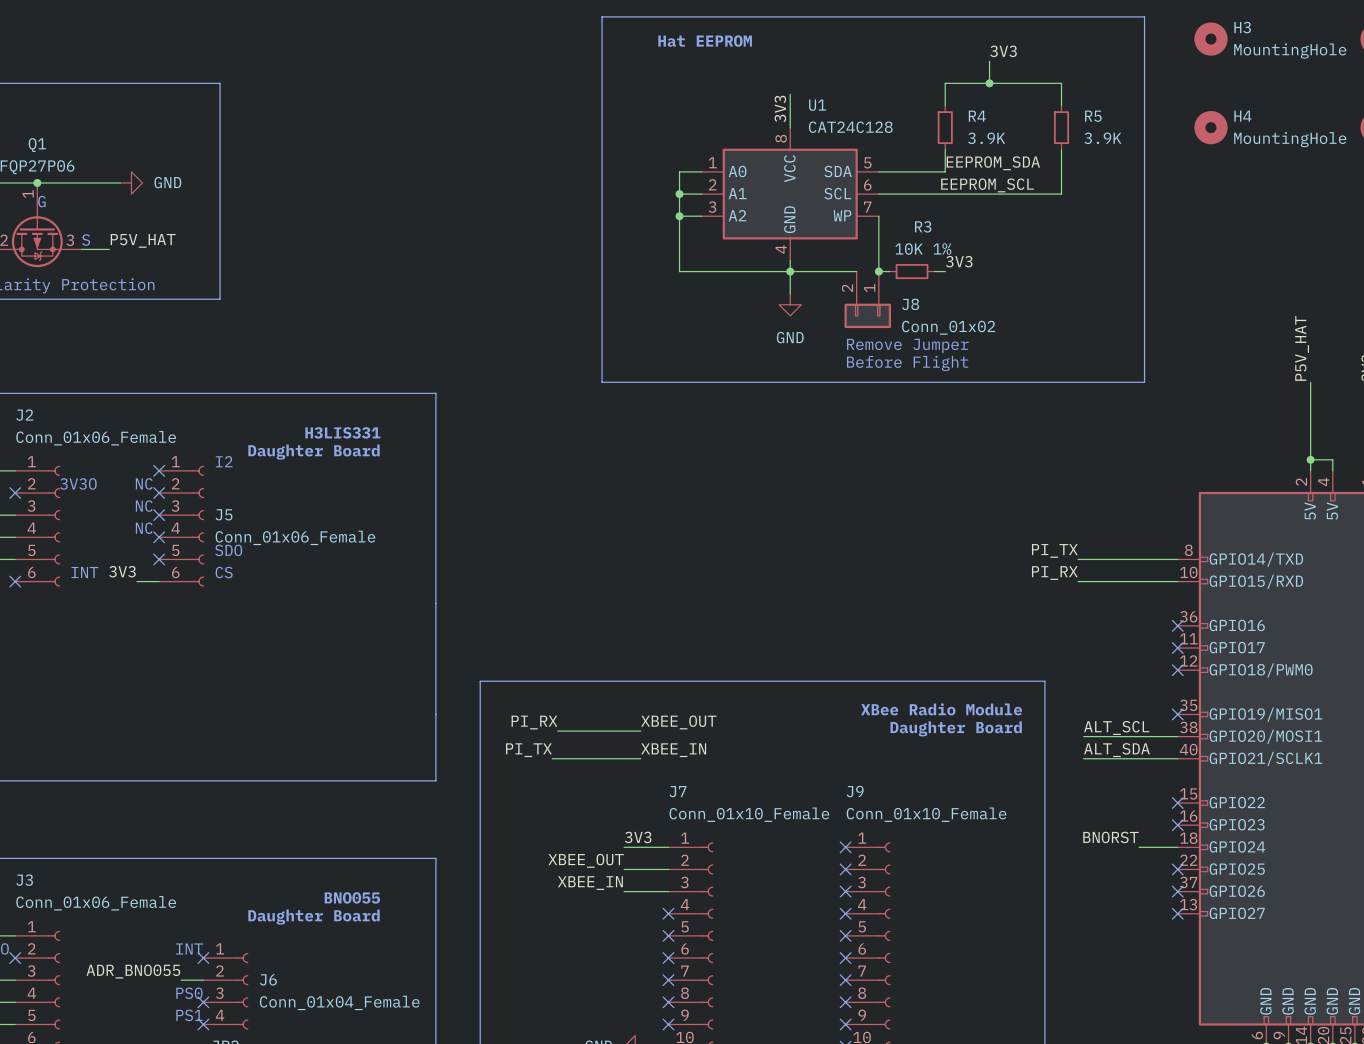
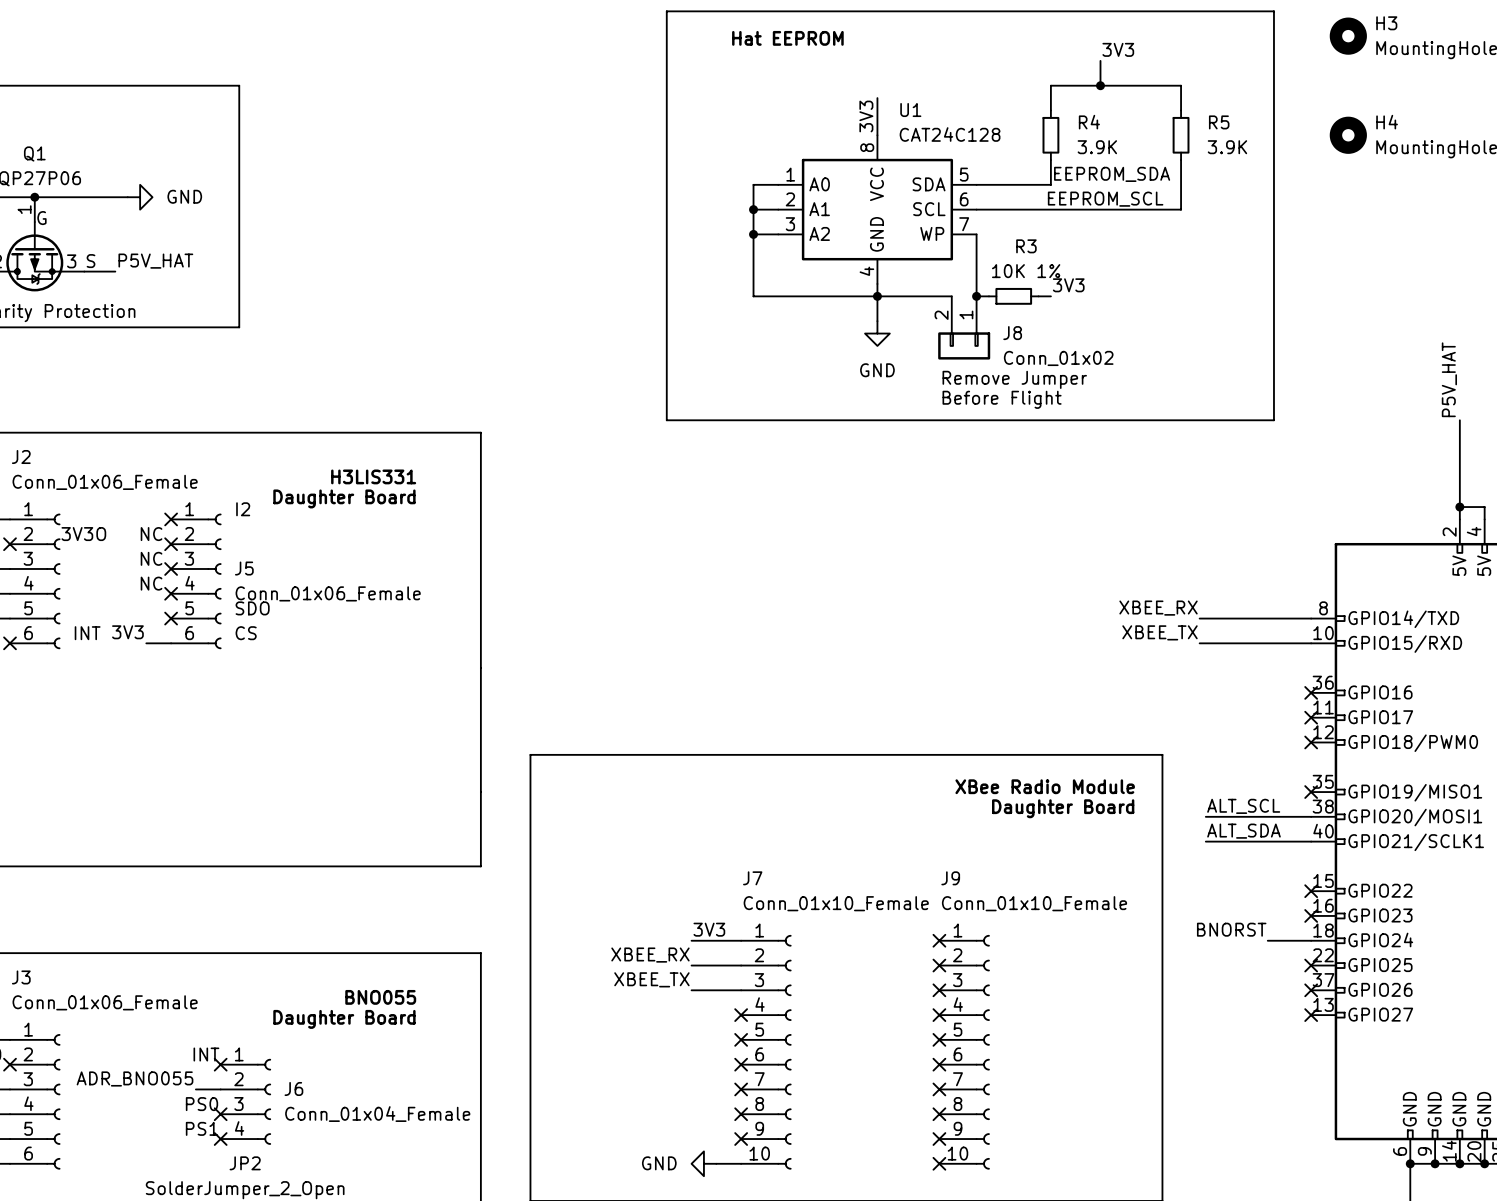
label: PI_TX (1054, 550) -> XBEE_RX (1158, 608)
label: PI_RX (1054, 573) -> XBEE_TX (1160, 632)
label: PI_RX (534, 722) -> none
label: XBEE_OUT (678, 722) -> none
wire: (557, 731) (640, 731) -> none
label: PI_TX (528, 750) -> none
label: XBEE_IN (673, 750) -> none
wire: (552, 758) (640, 758) -> none
label: XBEE_OUT (586, 860) -> XBEE_RX (650, 955)
label: XBEE_IN (590, 883) -> XBEE_TX (651, 979)

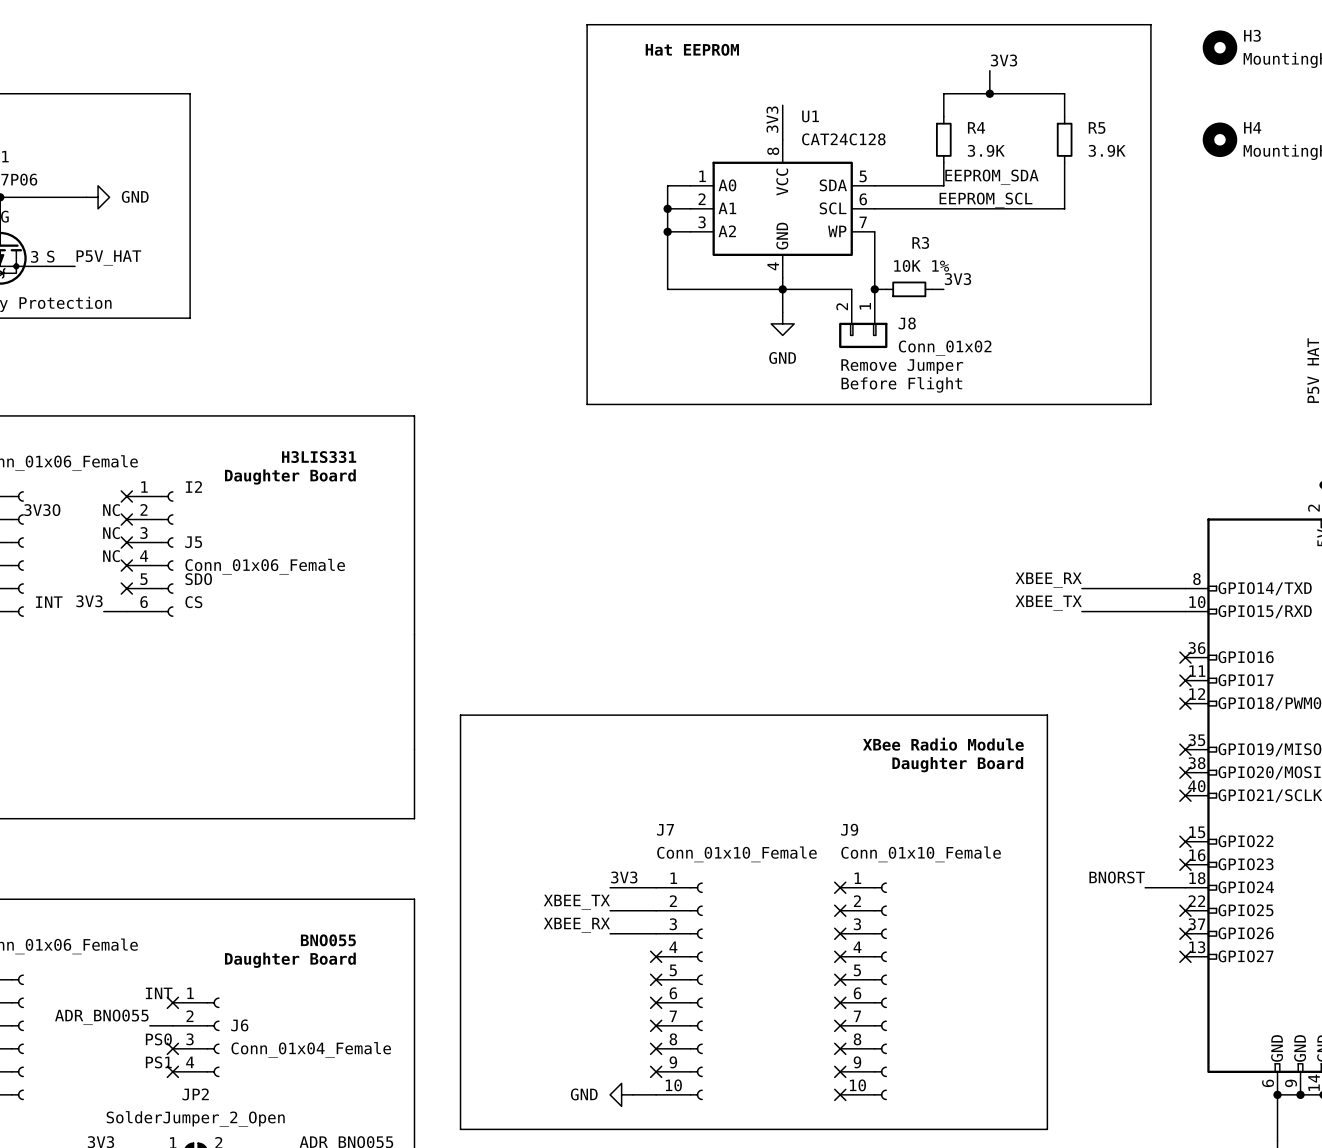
label: ALT_SCL (1243, 806) -> none
wire: (1205, 816) (1311, 816) -> none
no-connect mark: none -> (1185, 772)
label: ALT_SDA (1243, 831) -> none
wire: (1205, 841) (1311, 841) -> none
no-connect mark: none -> (1185, 795)
label: XBEE_RX (650, 955) -> XBEE_TX (576, 902)
label: XBEE_TX (651, 979) -> XBEE_RX (576, 925)

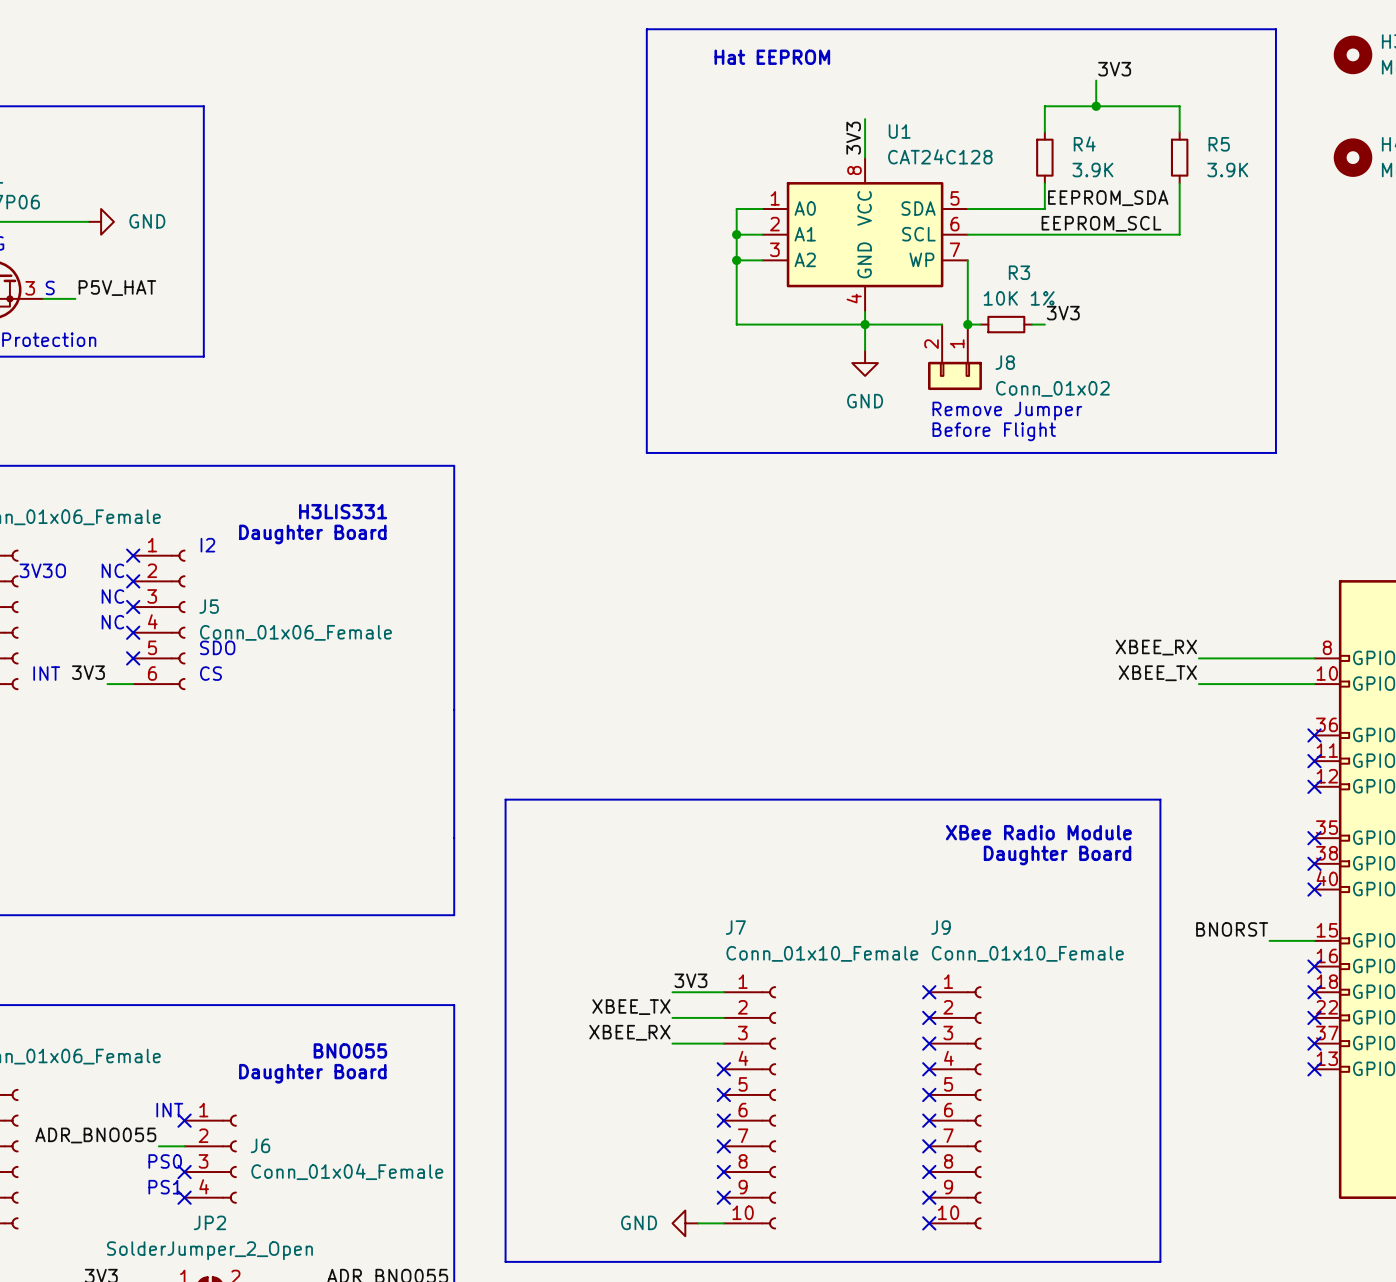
no-connect mark position: (1185, 841) -> (1314, 992)
label position: BNORST (1117, 877) -> BNORST (1232, 929)
wire: (1145, 887) (1185, 887) -> (1269, 940) (1314, 940)

